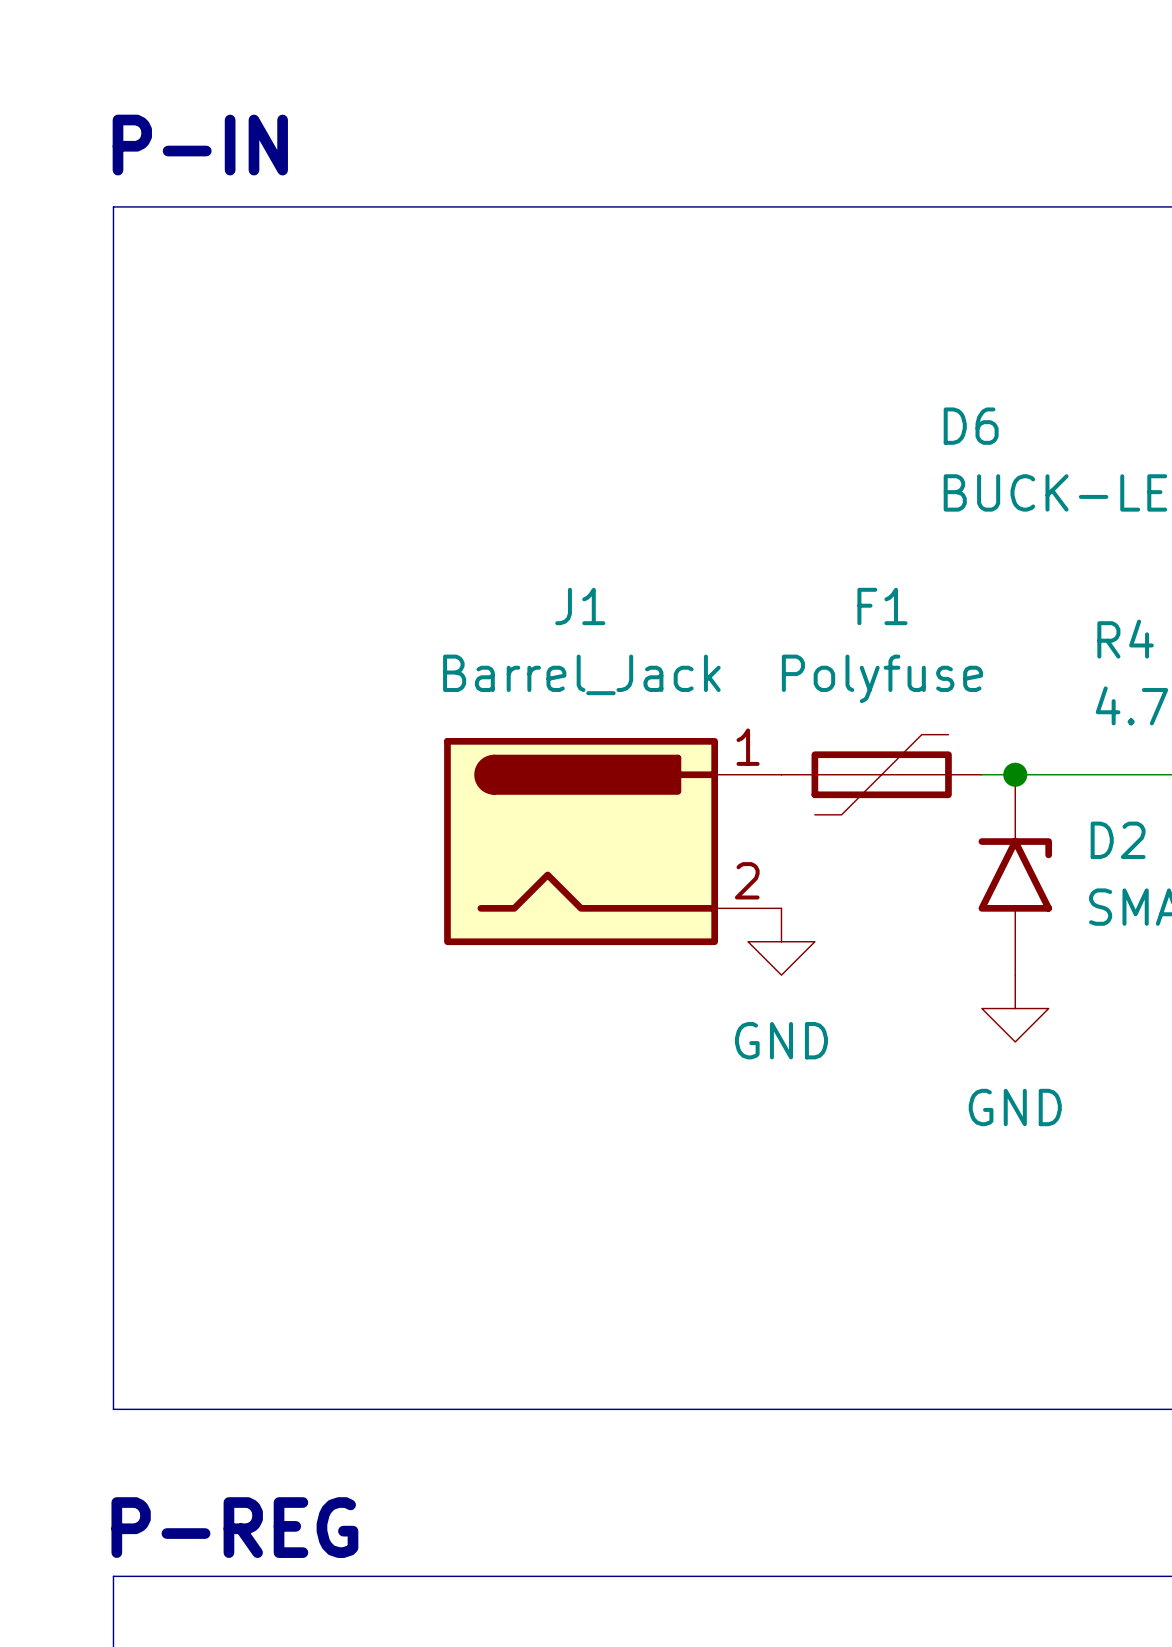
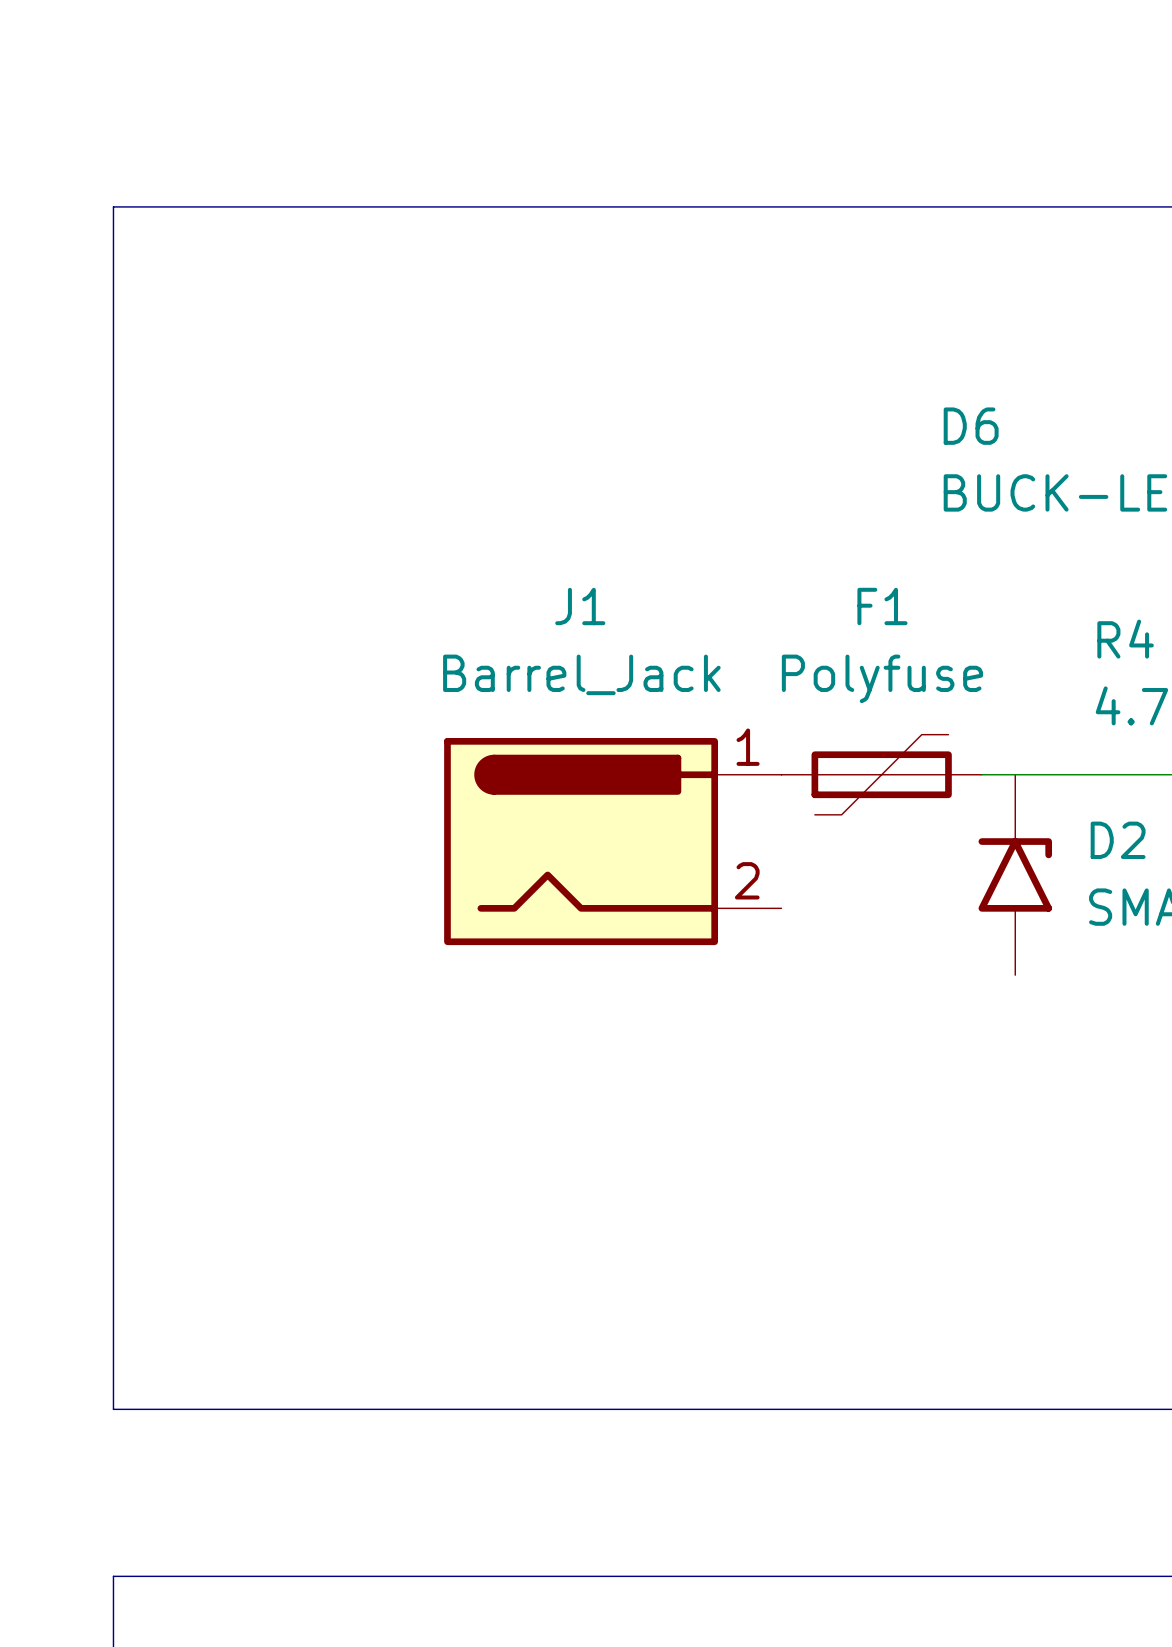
text: P-IN (200, 145) -> none
junction: (1015, 774) -> none
power symbol: GND (781, 941) -> none
power symbol: GND (1015, 1008) -> none
text: P-REG (234, 1527) -> none

